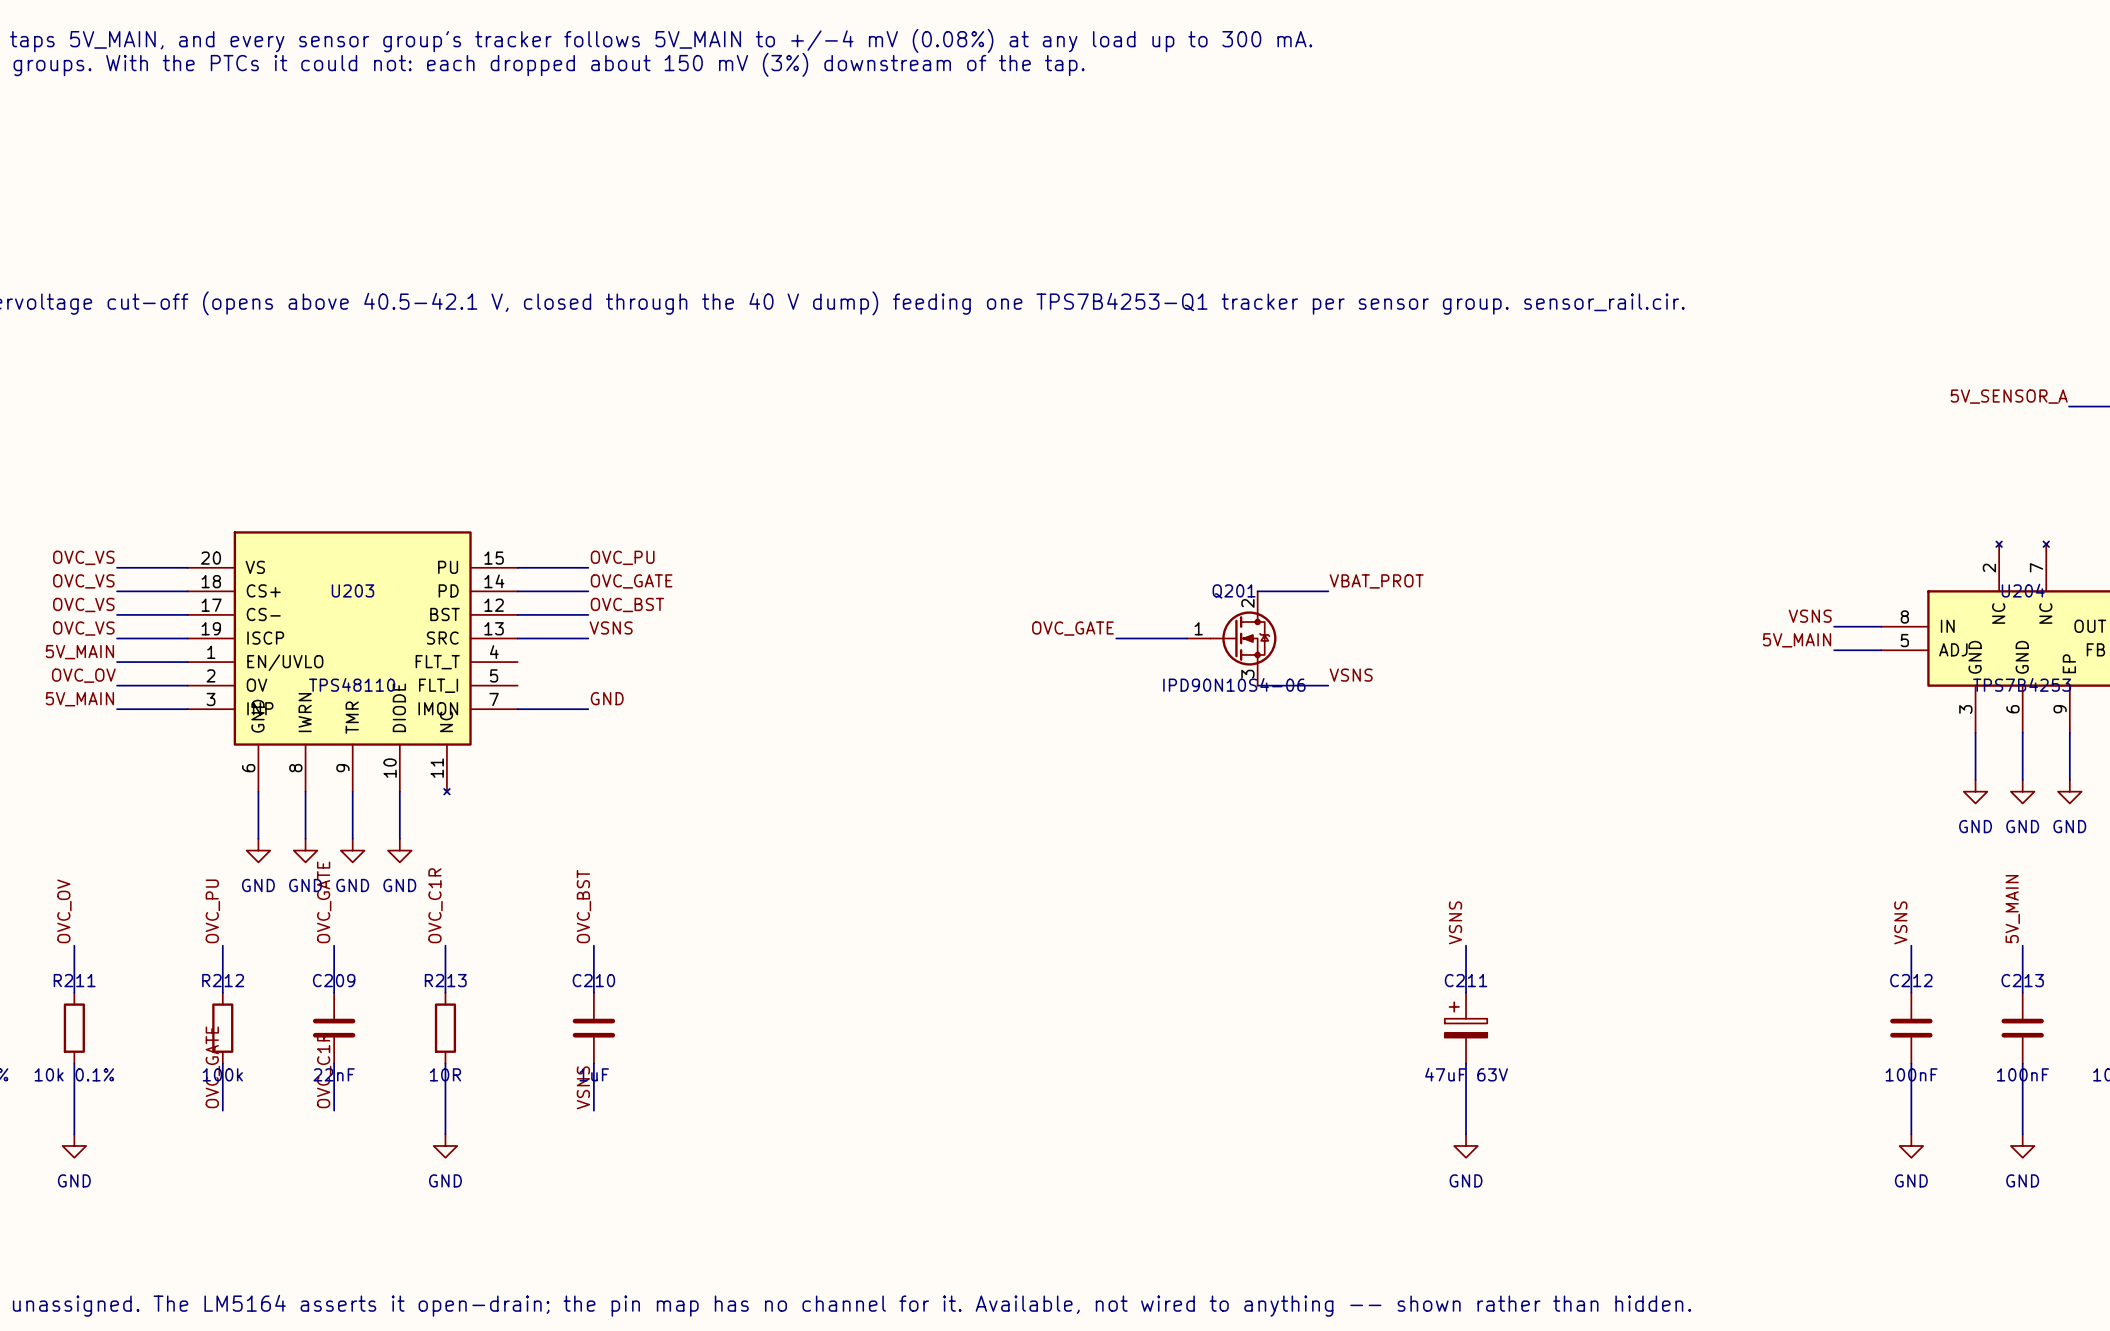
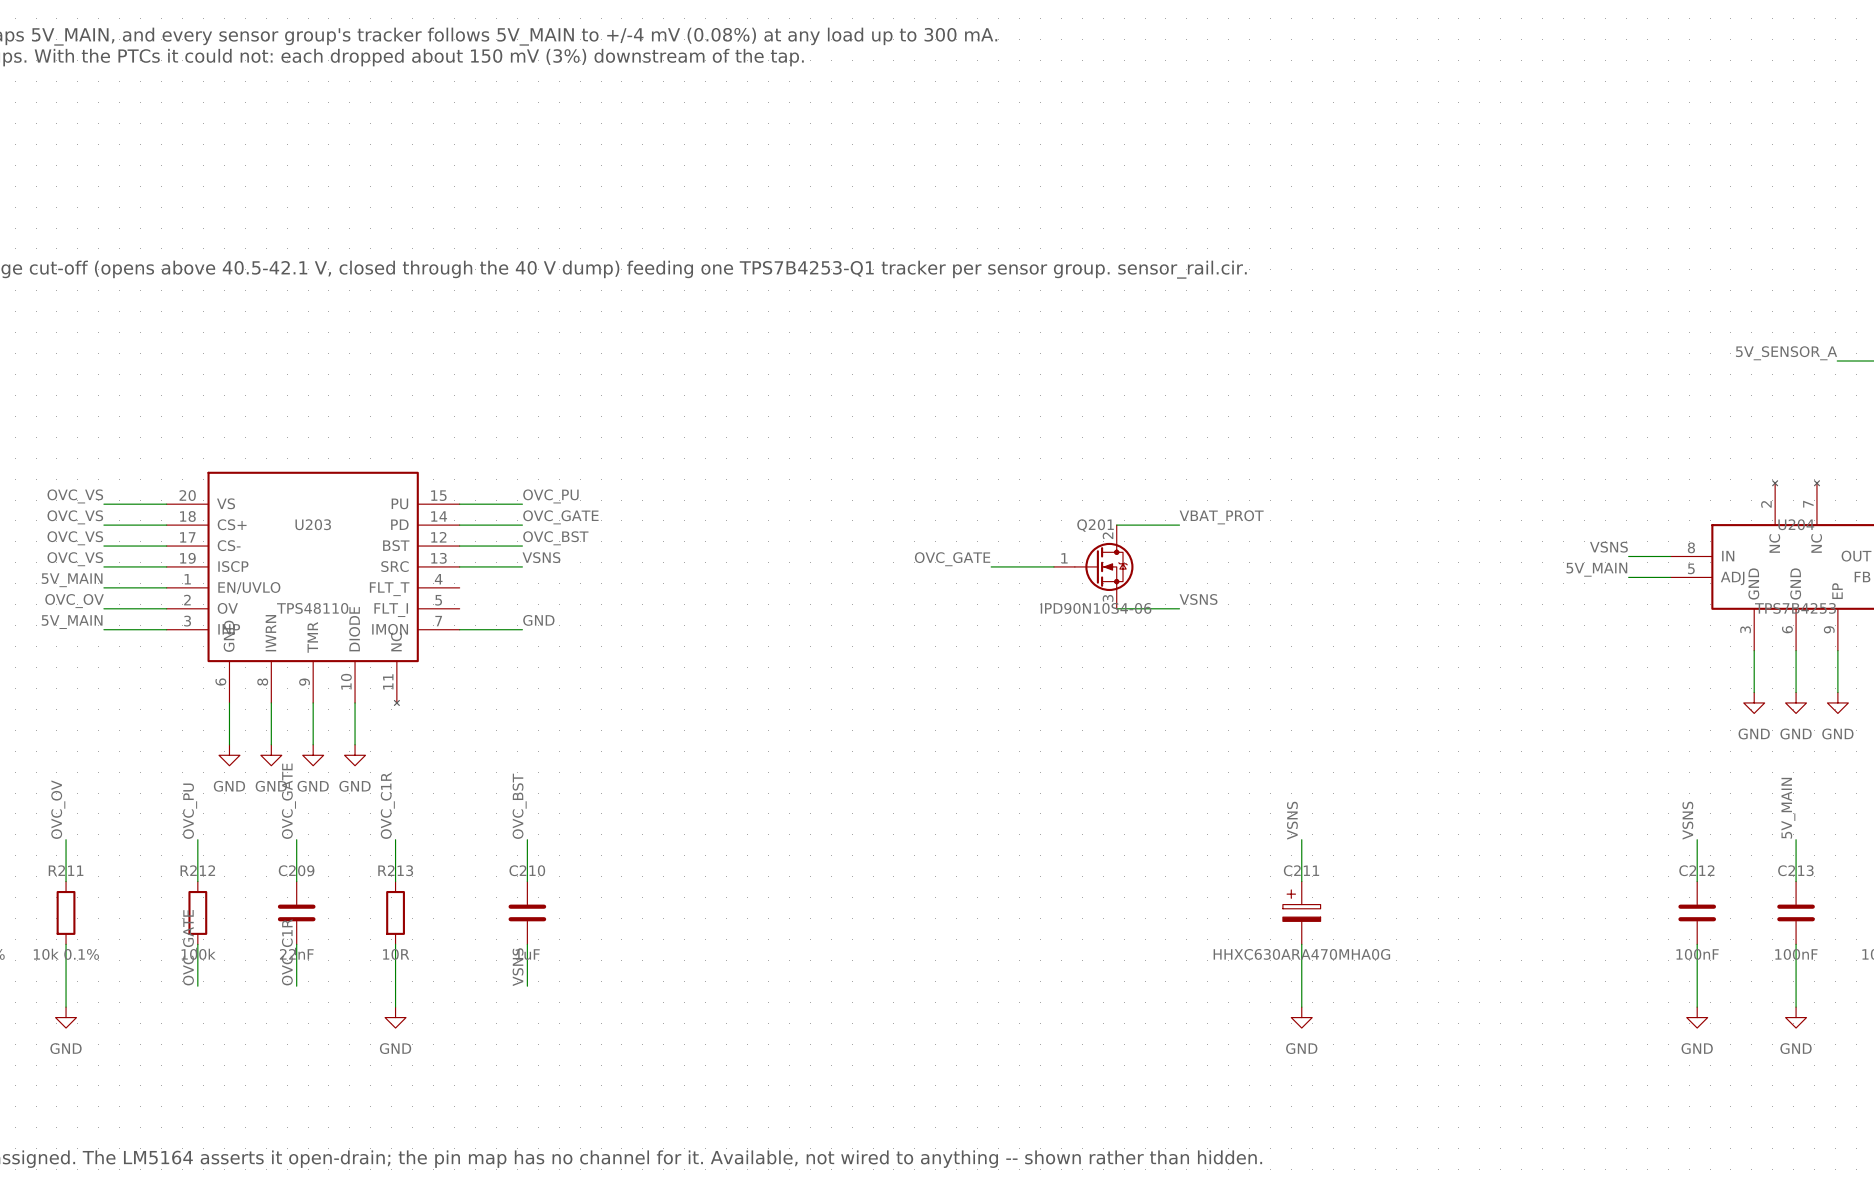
C211 value: 47uF 63V (1466, 1074) -> HHXC630ARA470MHA0G (1301, 954)

